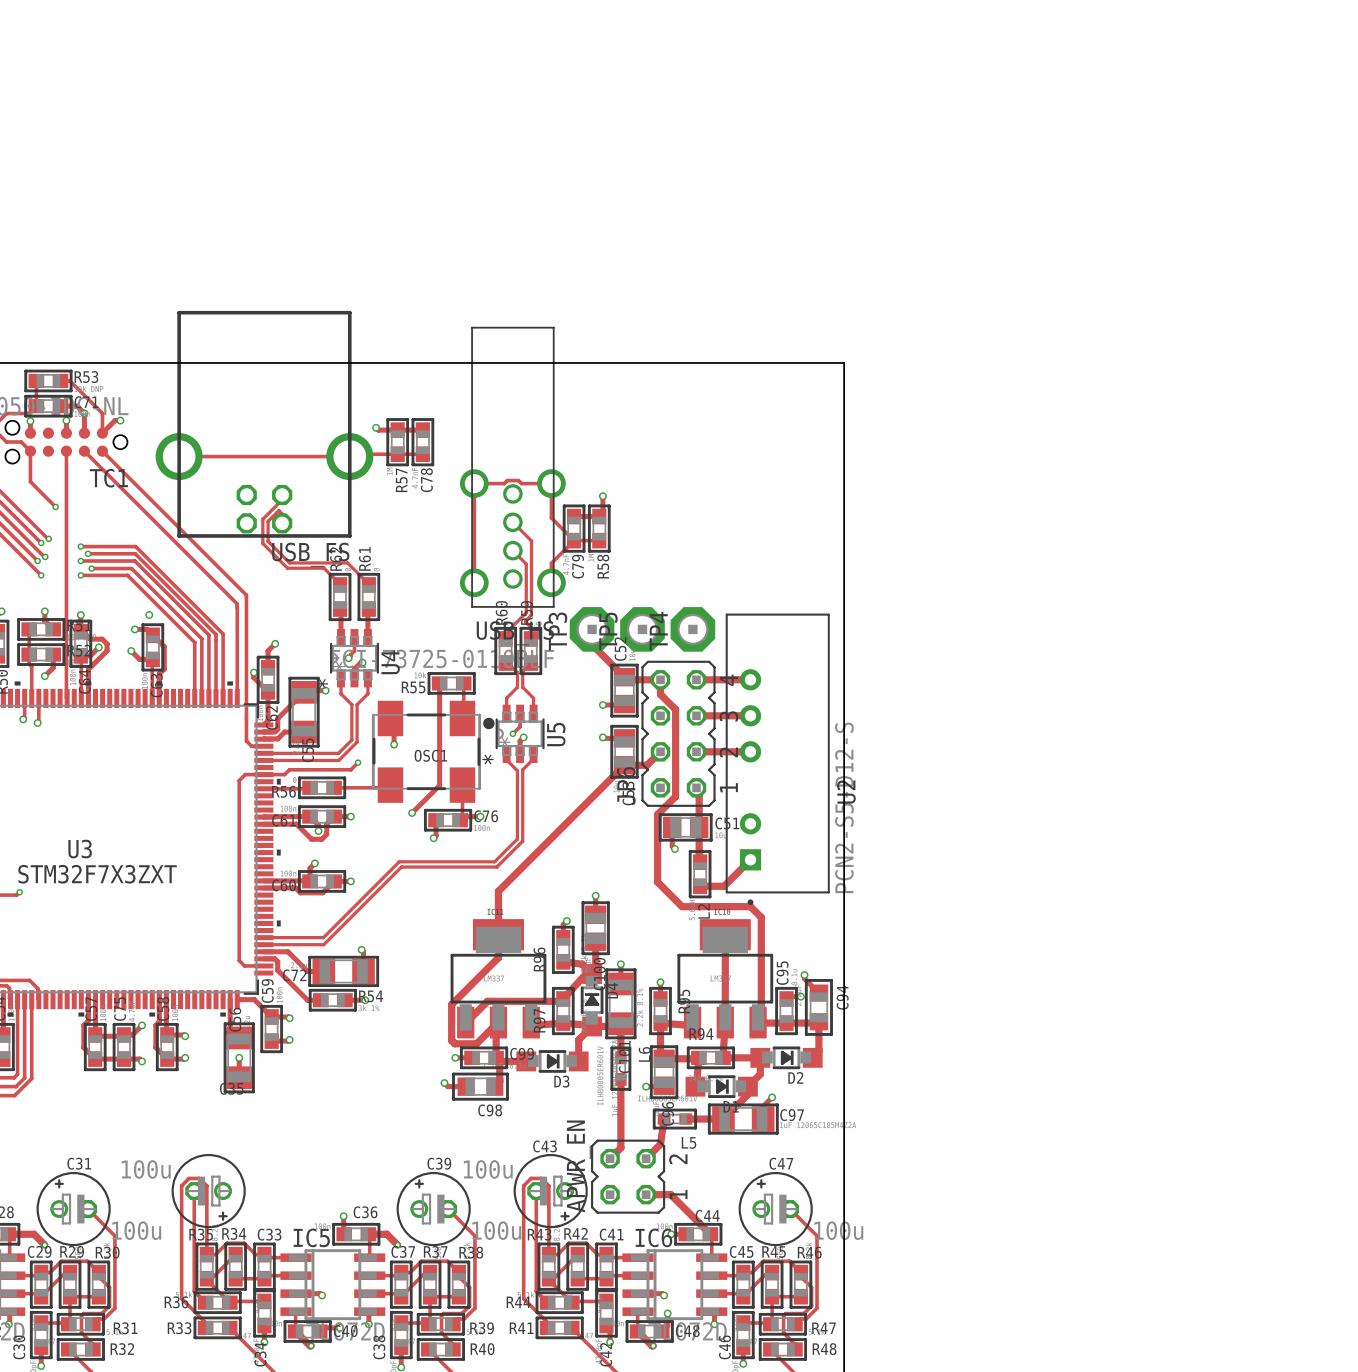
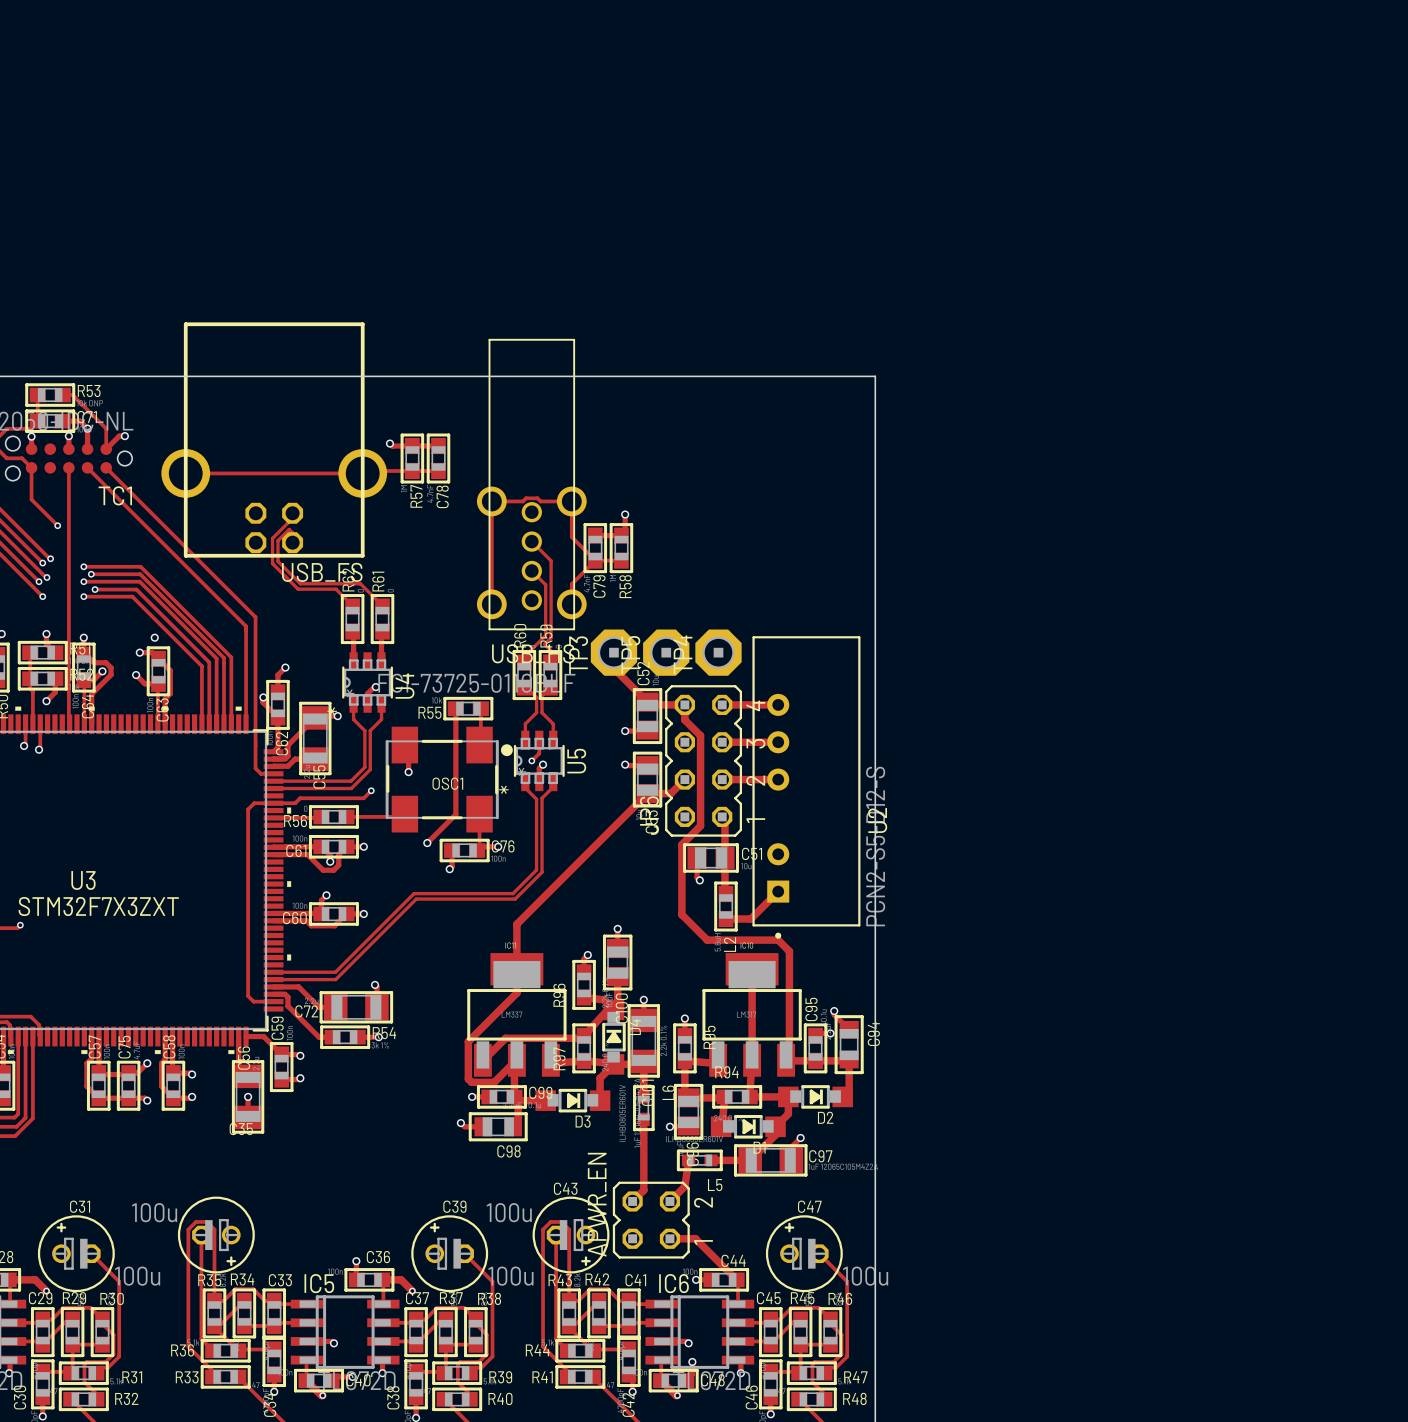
track: (354, 637) (354, 651) (348, 658) -> none
via: (348, 658) -> none

